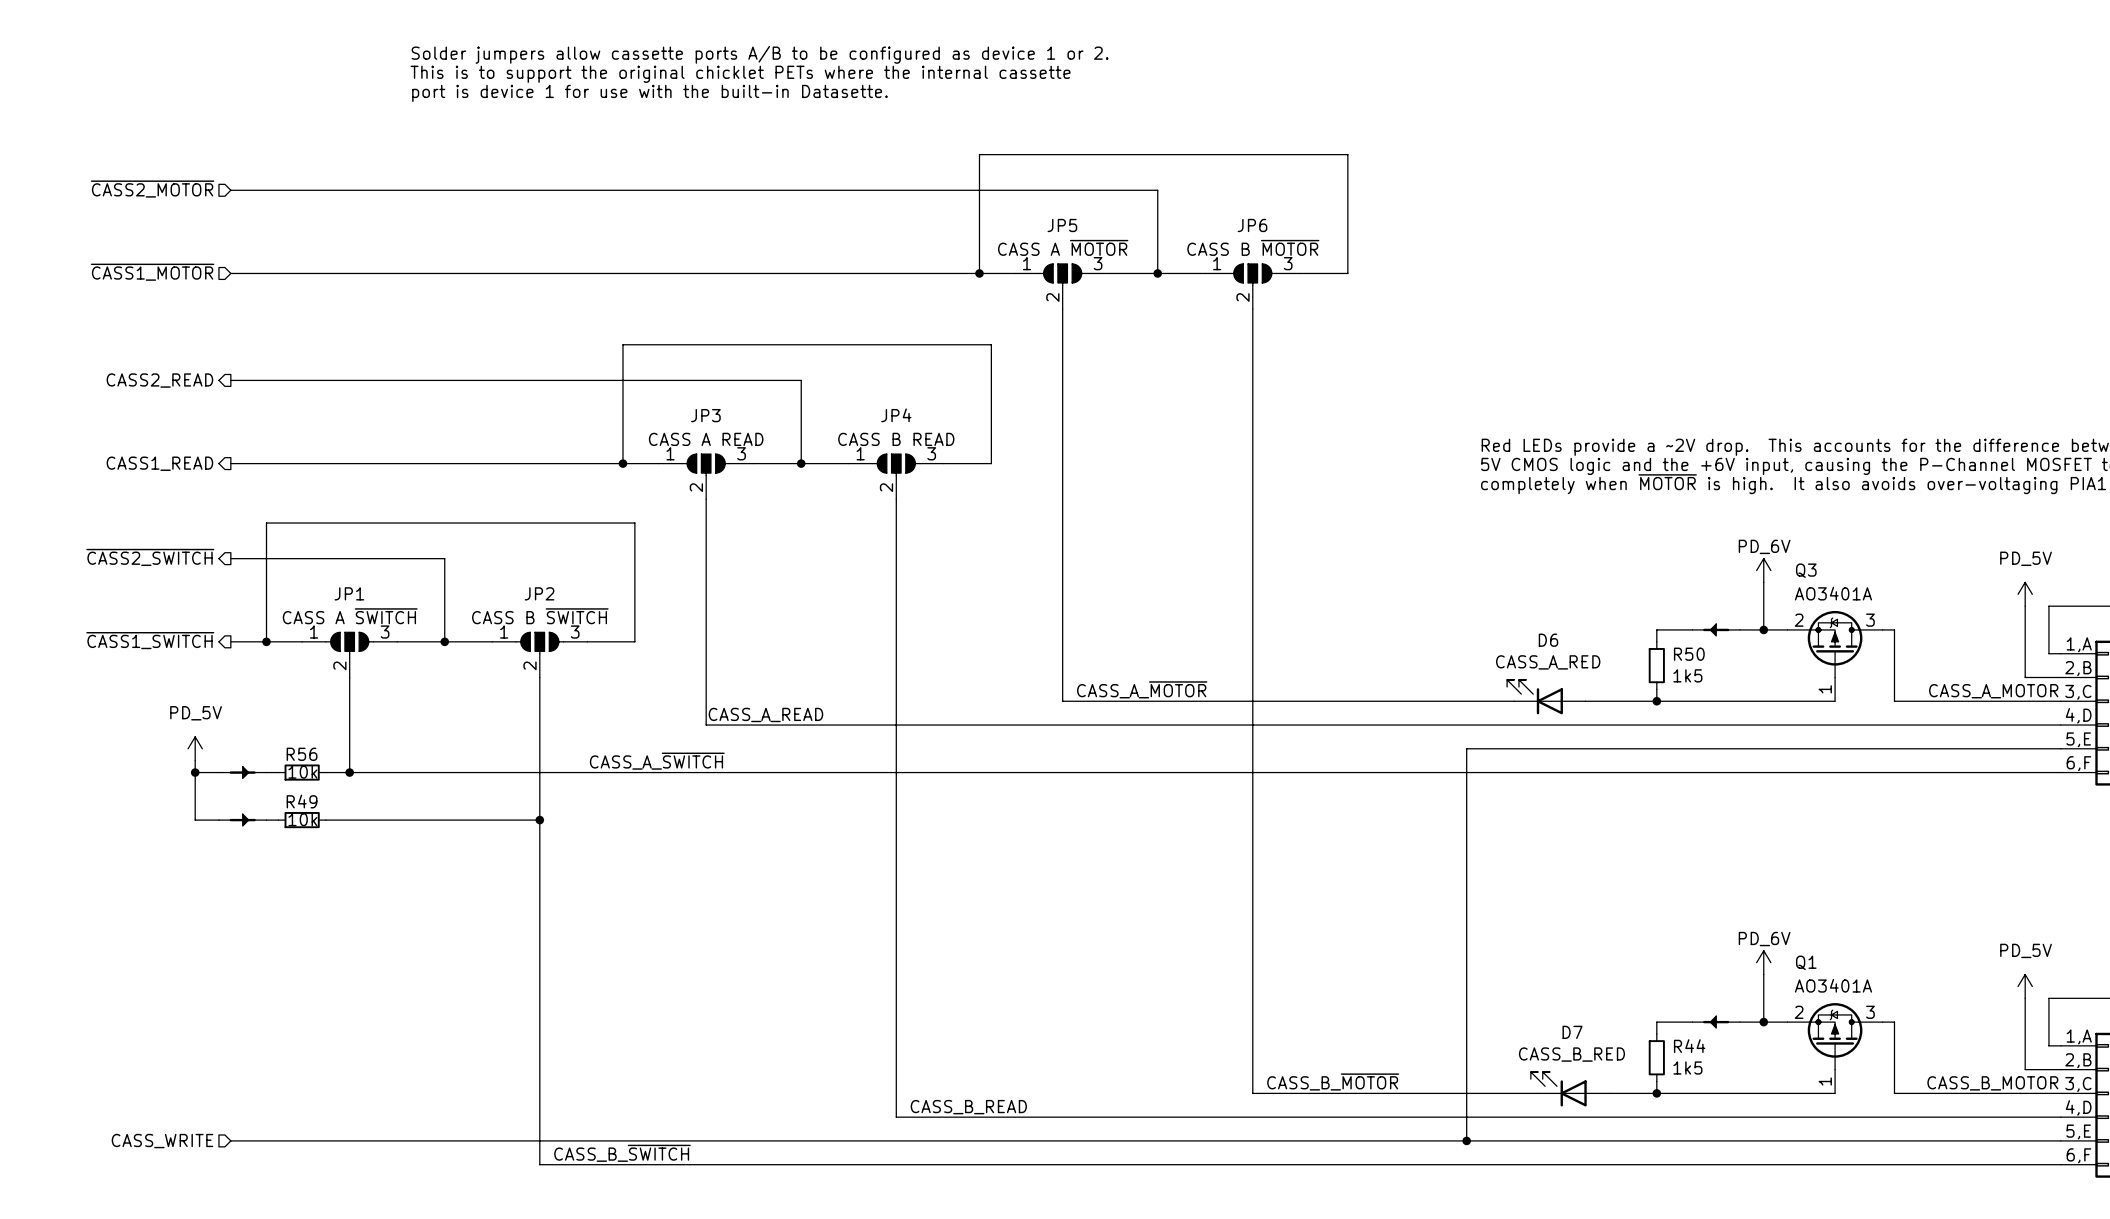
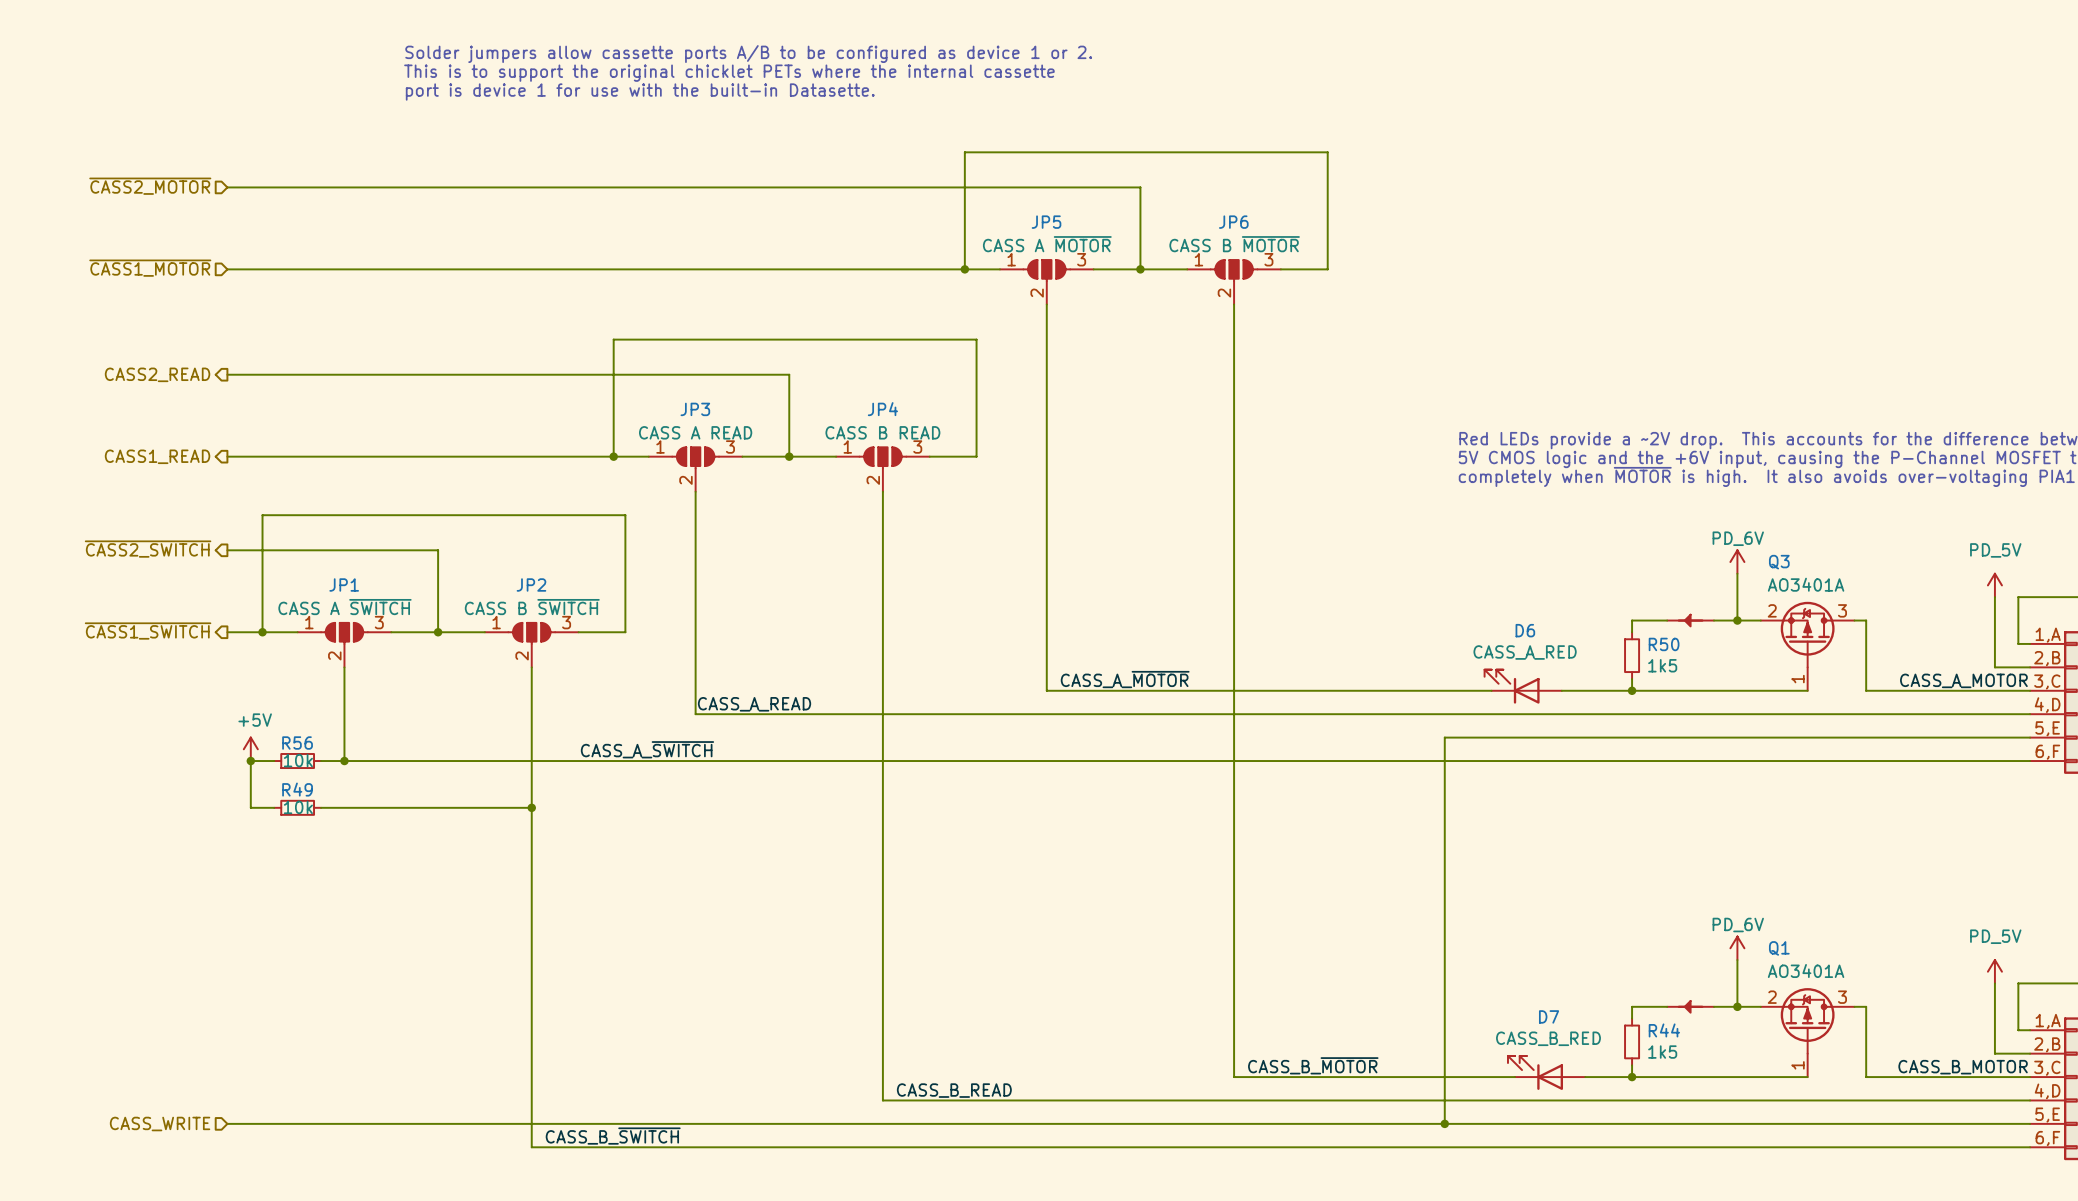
power symbol: PD_5V (195, 748) -> none
wire: (195, 760) (195, 820) (218, 820) -> none
power symbol: none -> +5V (250, 749)
wire: (195, 772) (218, 772) -> none
junction: (195, 772) -> none
part: (242, 772) -> none
junction: none -> (250, 761)
wire: none -> (262, 761) (250, 761) (250, 807) (262, 807)
part: (242, 820) -> none

